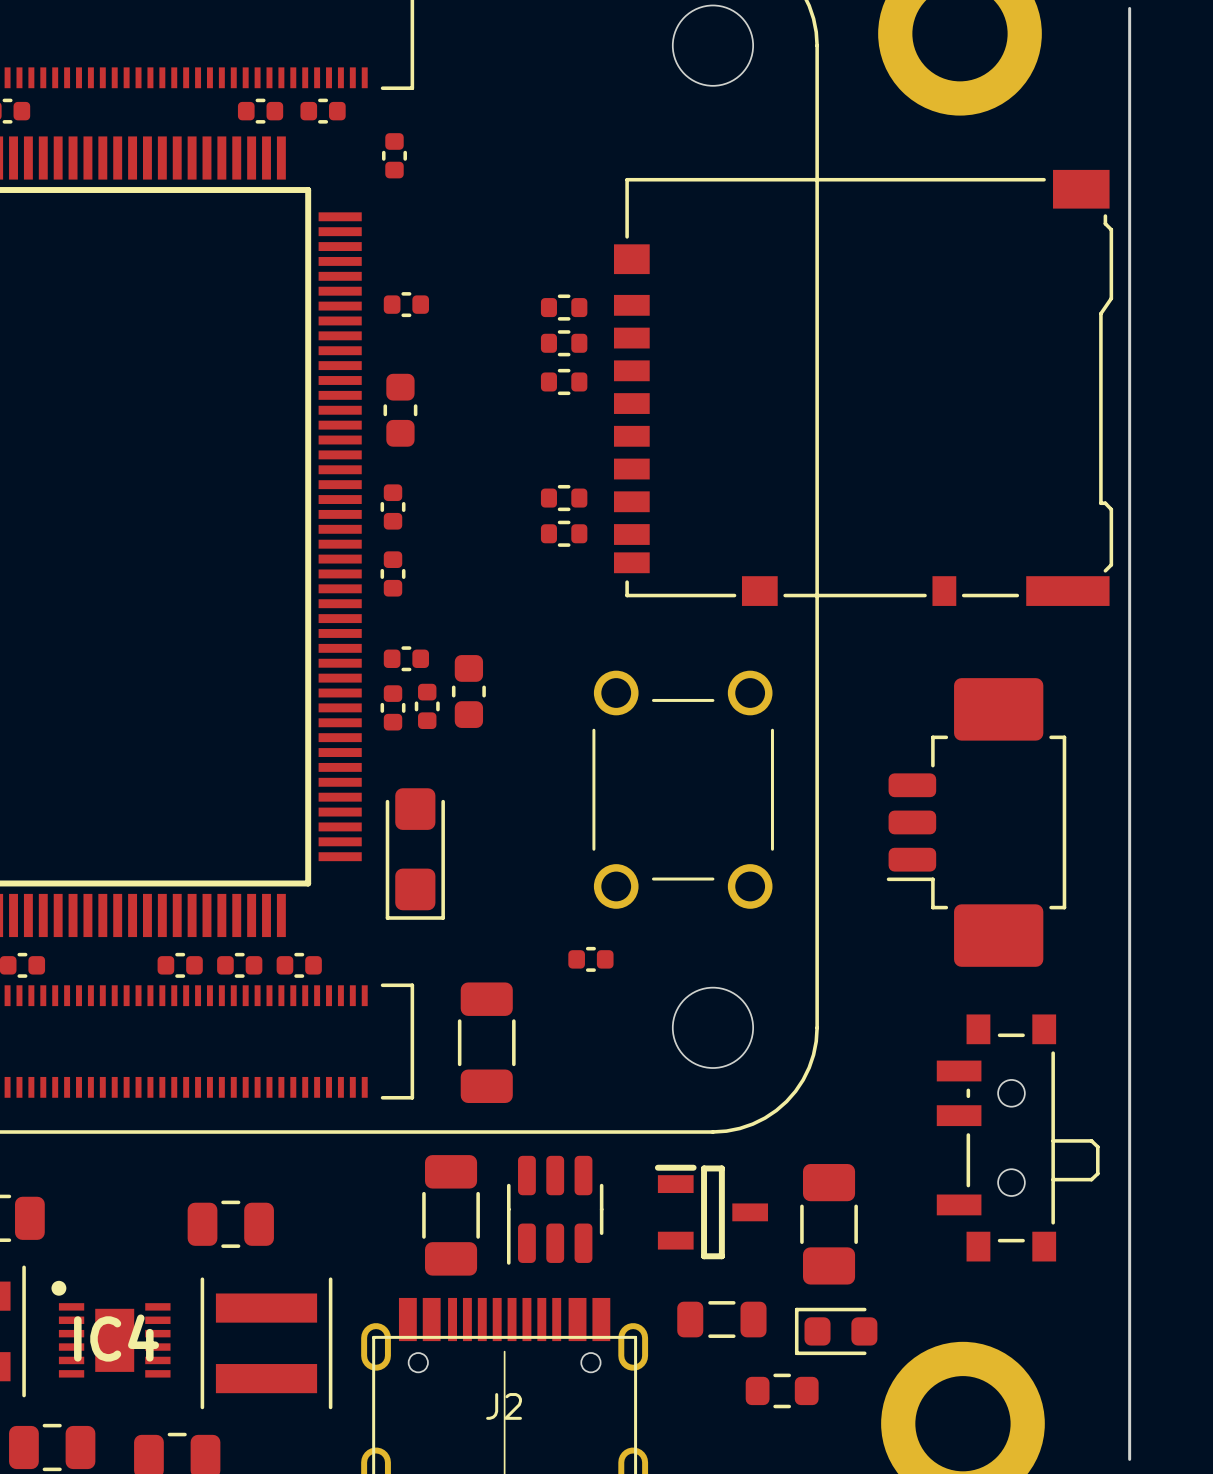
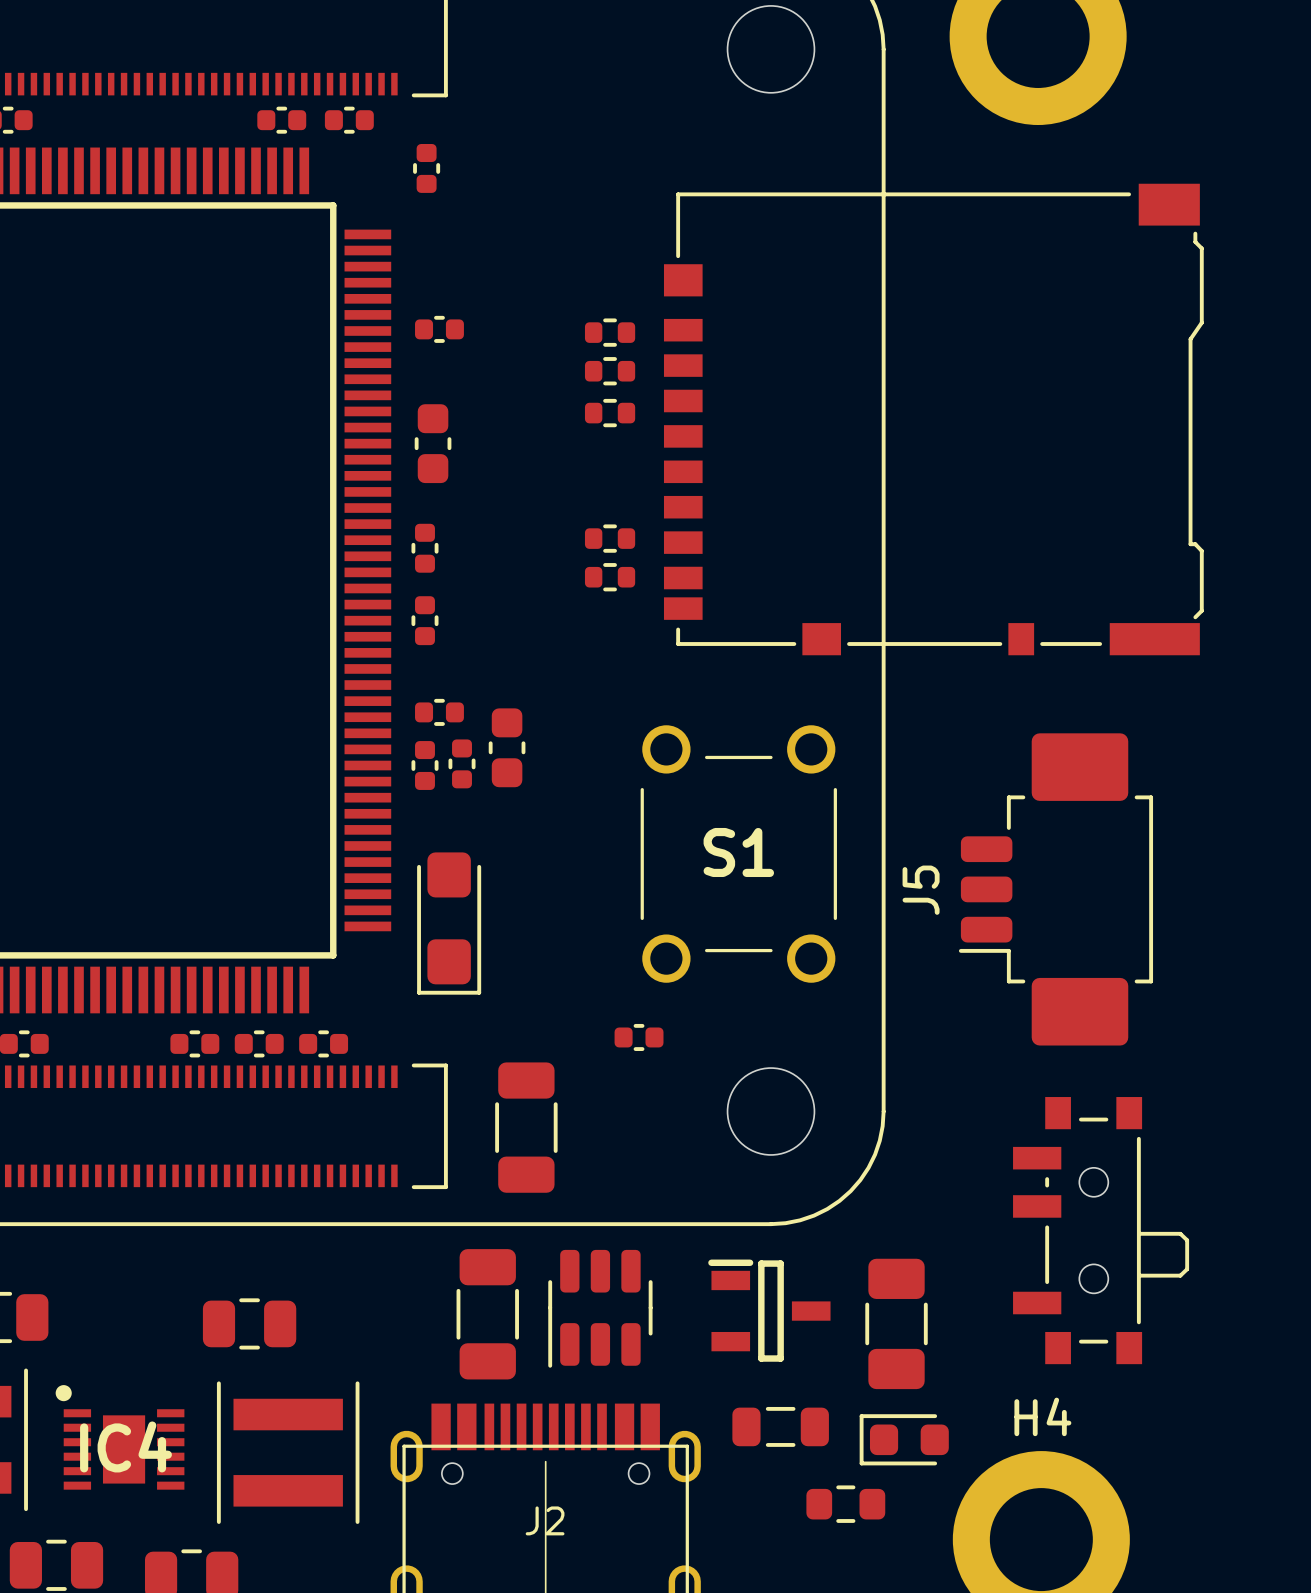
board edge: (1129, 8) (1129, 1459) -> none
S1 name: none -> S1 (738, 852)
J5 name: none -> J5 (921, 890)
H4 name: none -> H4 (1042, 1416)

